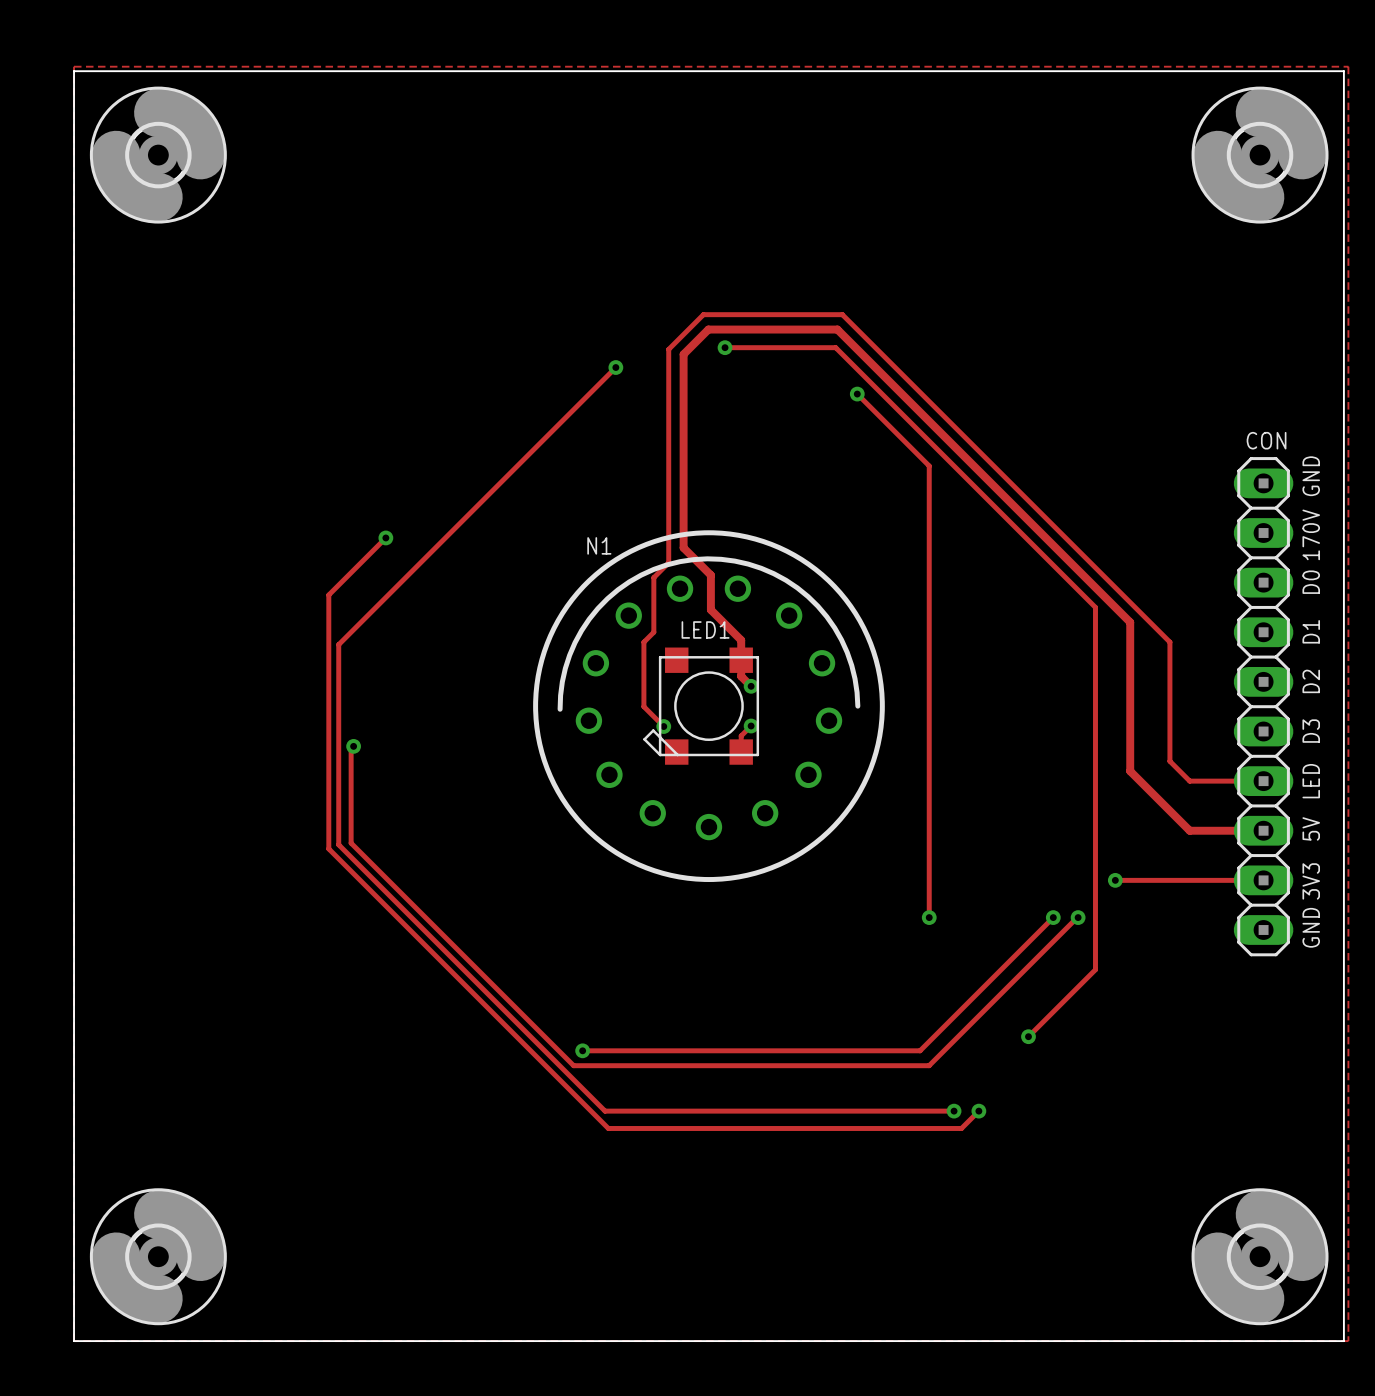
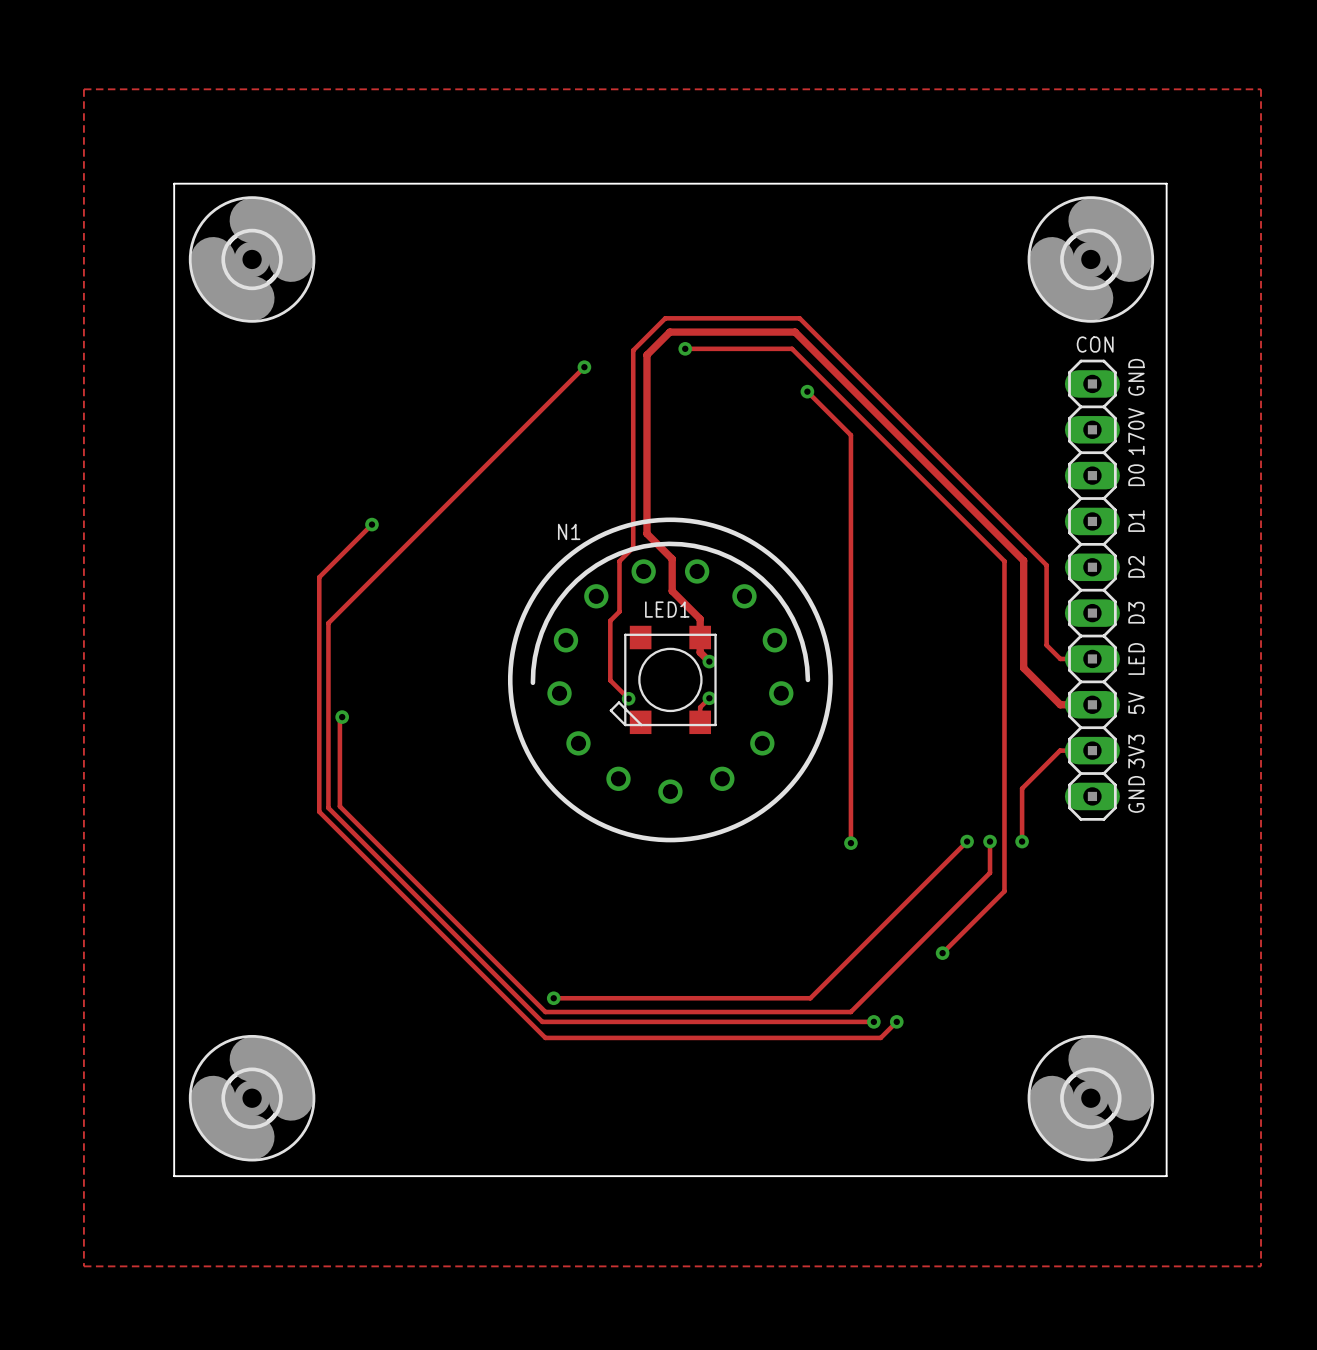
board edge: (74, 71) (1343, 71) (1343, 1341) (74, 1341) (74, 71) -> (174, 183) (174, 1176) (1166, 1176) (1166, 183) (174, 183)
part position: (158, 155) -> (252, 259)
part position: (1260, 155) -> (1090, 259)
track: (842, 314) (1169, 642) (1169, 761) (1189, 781) (1263, 781) -> (793, 318) (799, 318) (1046, 565) (1046, 645) (1060, 658) (1092, 658)
track: (837, 329) (1130, 622) (1130, 771) (1189, 830) (1263, 830) -> (789, 332) (795, 332) (1023, 560) (1023, 668) (1060, 704) (1092, 704)
track: (835, 347) (1095, 607) (1095, 969) (1028, 1036) -> (787, 348) (792, 348) (1004, 561) (1004, 891) (942, 953)
track: (904, 441) (929, 466) (929, 917) -> (850, 435) (850, 843)
text position: GND (1311, 476) -> GND (1136, 377)
text position: 170V (1311, 534) -> 170V (1136, 431)
text position: D0 (1311, 582) -> D0 (1136, 475)
text position: D1 (1311, 631) -> D1 (1136, 521)
text position: D2 (1311, 681) -> D2 (1136, 566)
CON position: (1263, 706) -> (1092, 590)
text position: D3 (1311, 731) -> D3 (1136, 612)
text position: LED (1311, 781) -> LED (1136, 658)
track: none -> (1092, 750) (1060, 750) (1022, 788) (1022, 841)
text position: 5V (1311, 828) -> 5V (1136, 703)
track: (1115, 880) (1263, 880) -> none
via: (1115, 880) -> none
via: none -> (967, 841)
via: none -> (990, 841)
via: none -> (1022, 841)
text position: 3V3 (1311, 881) -> 3V3 (1136, 751)
via position: (929, 917) -> (850, 843)
track: (1053, 917) (920, 1050) (860, 1050) -> (967, 841) (810, 998)
via: (1053, 917) -> none
track: (1078, 917) (929, 1065) (904, 1065) -> (990, 841) (990, 872) (850, 1012)
via: (1078, 917) -> none
text position: GND (1311, 927) -> GND (1136, 794)
via: none -> (942, 953)
via: (1028, 1036) -> none
track: (570, 1076) (605, 1111) (954, 1111) -> (542, 1021) (873, 1021)
via: none -> (873, 1021)
via: none -> (896, 1021)
track: (573, 1093) (608, 1128) (961, 1128) (978, 1111) -> (545, 1037) (880, 1037) (896, 1021)
via: (954, 1111) -> none
via: (978, 1111) -> none
part position: (158, 1256) -> (252, 1098)
part position: (1260, 1256) -> (1090, 1098)

